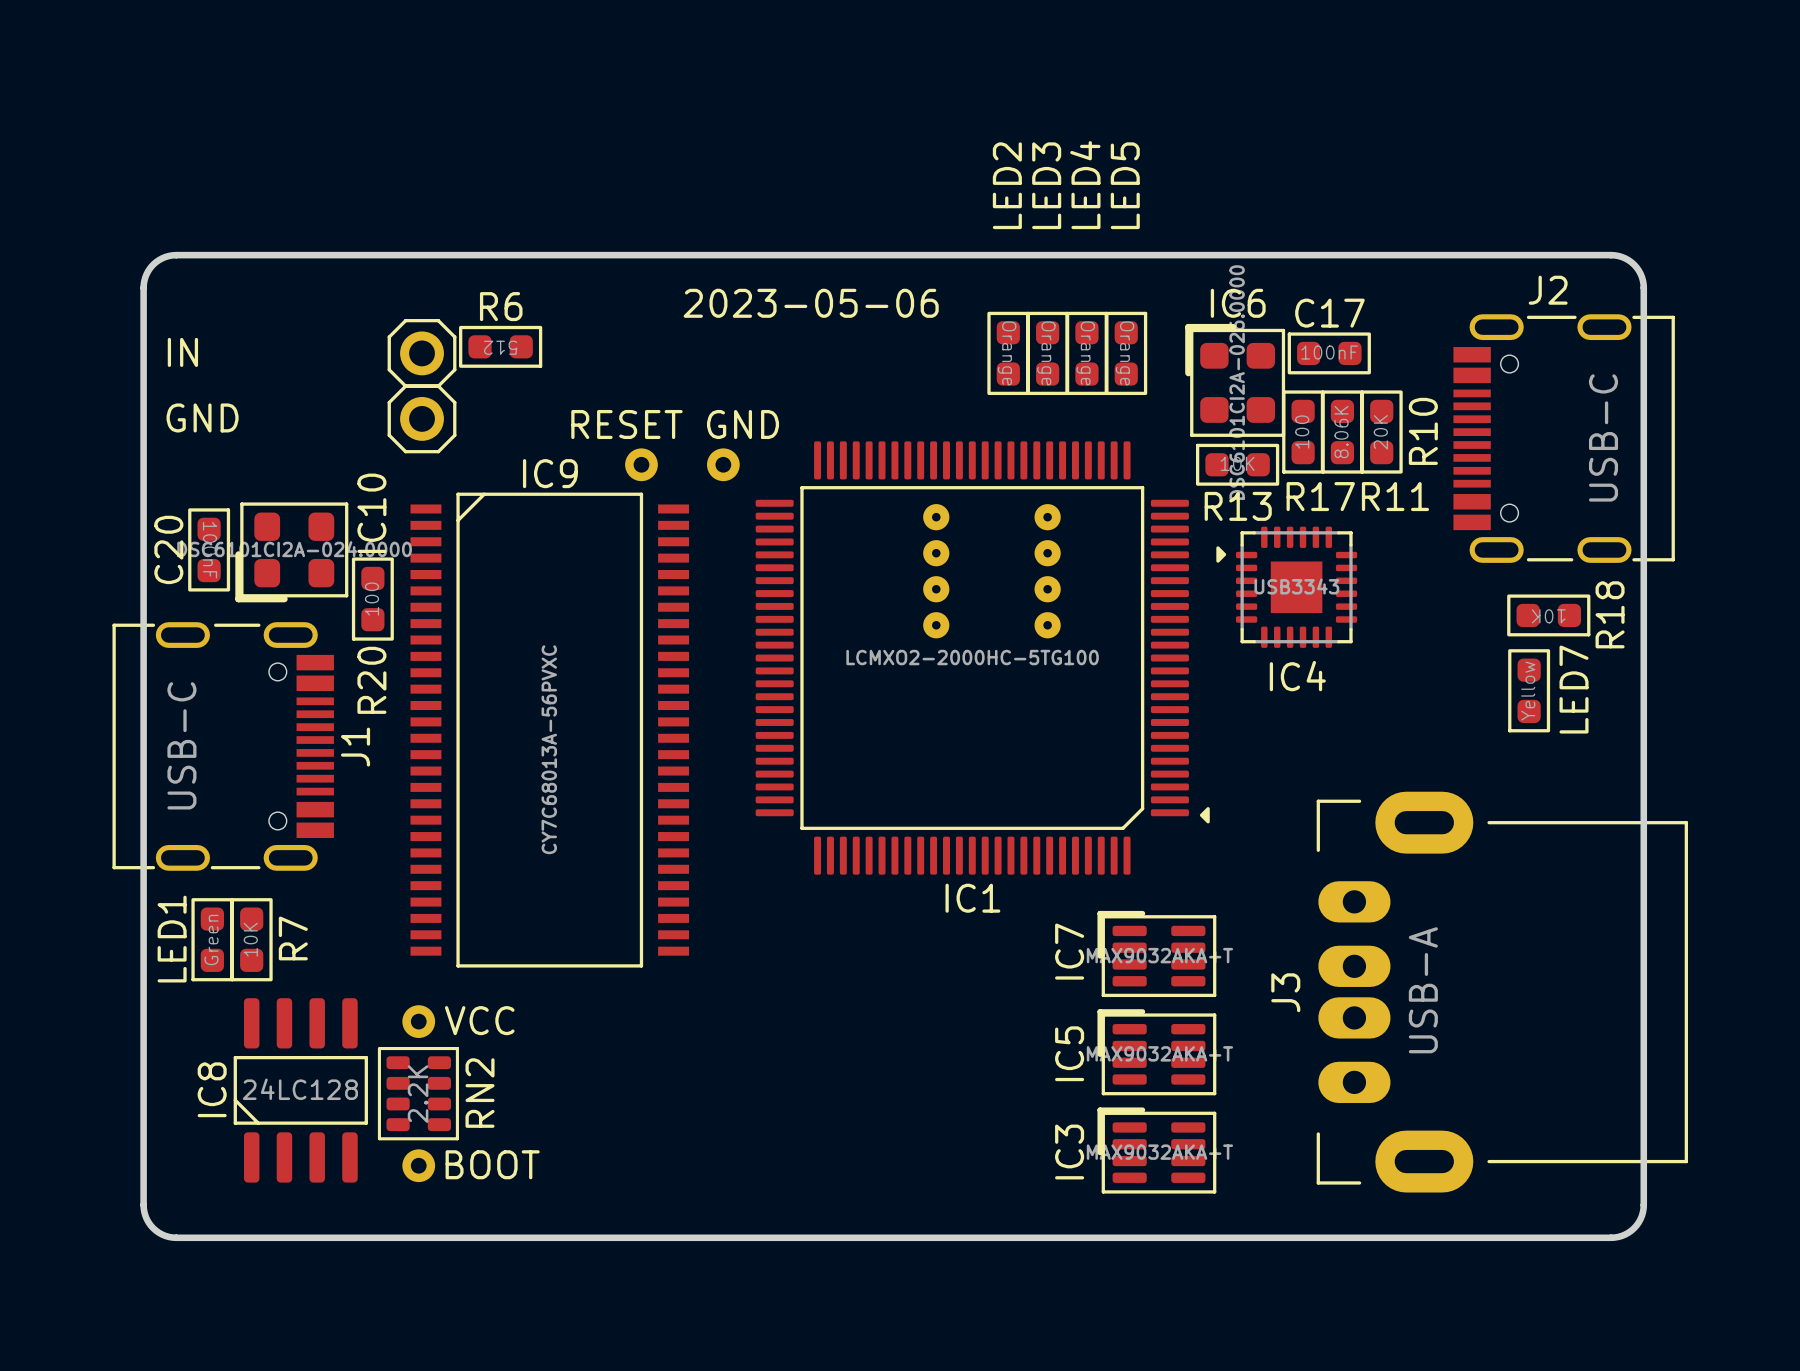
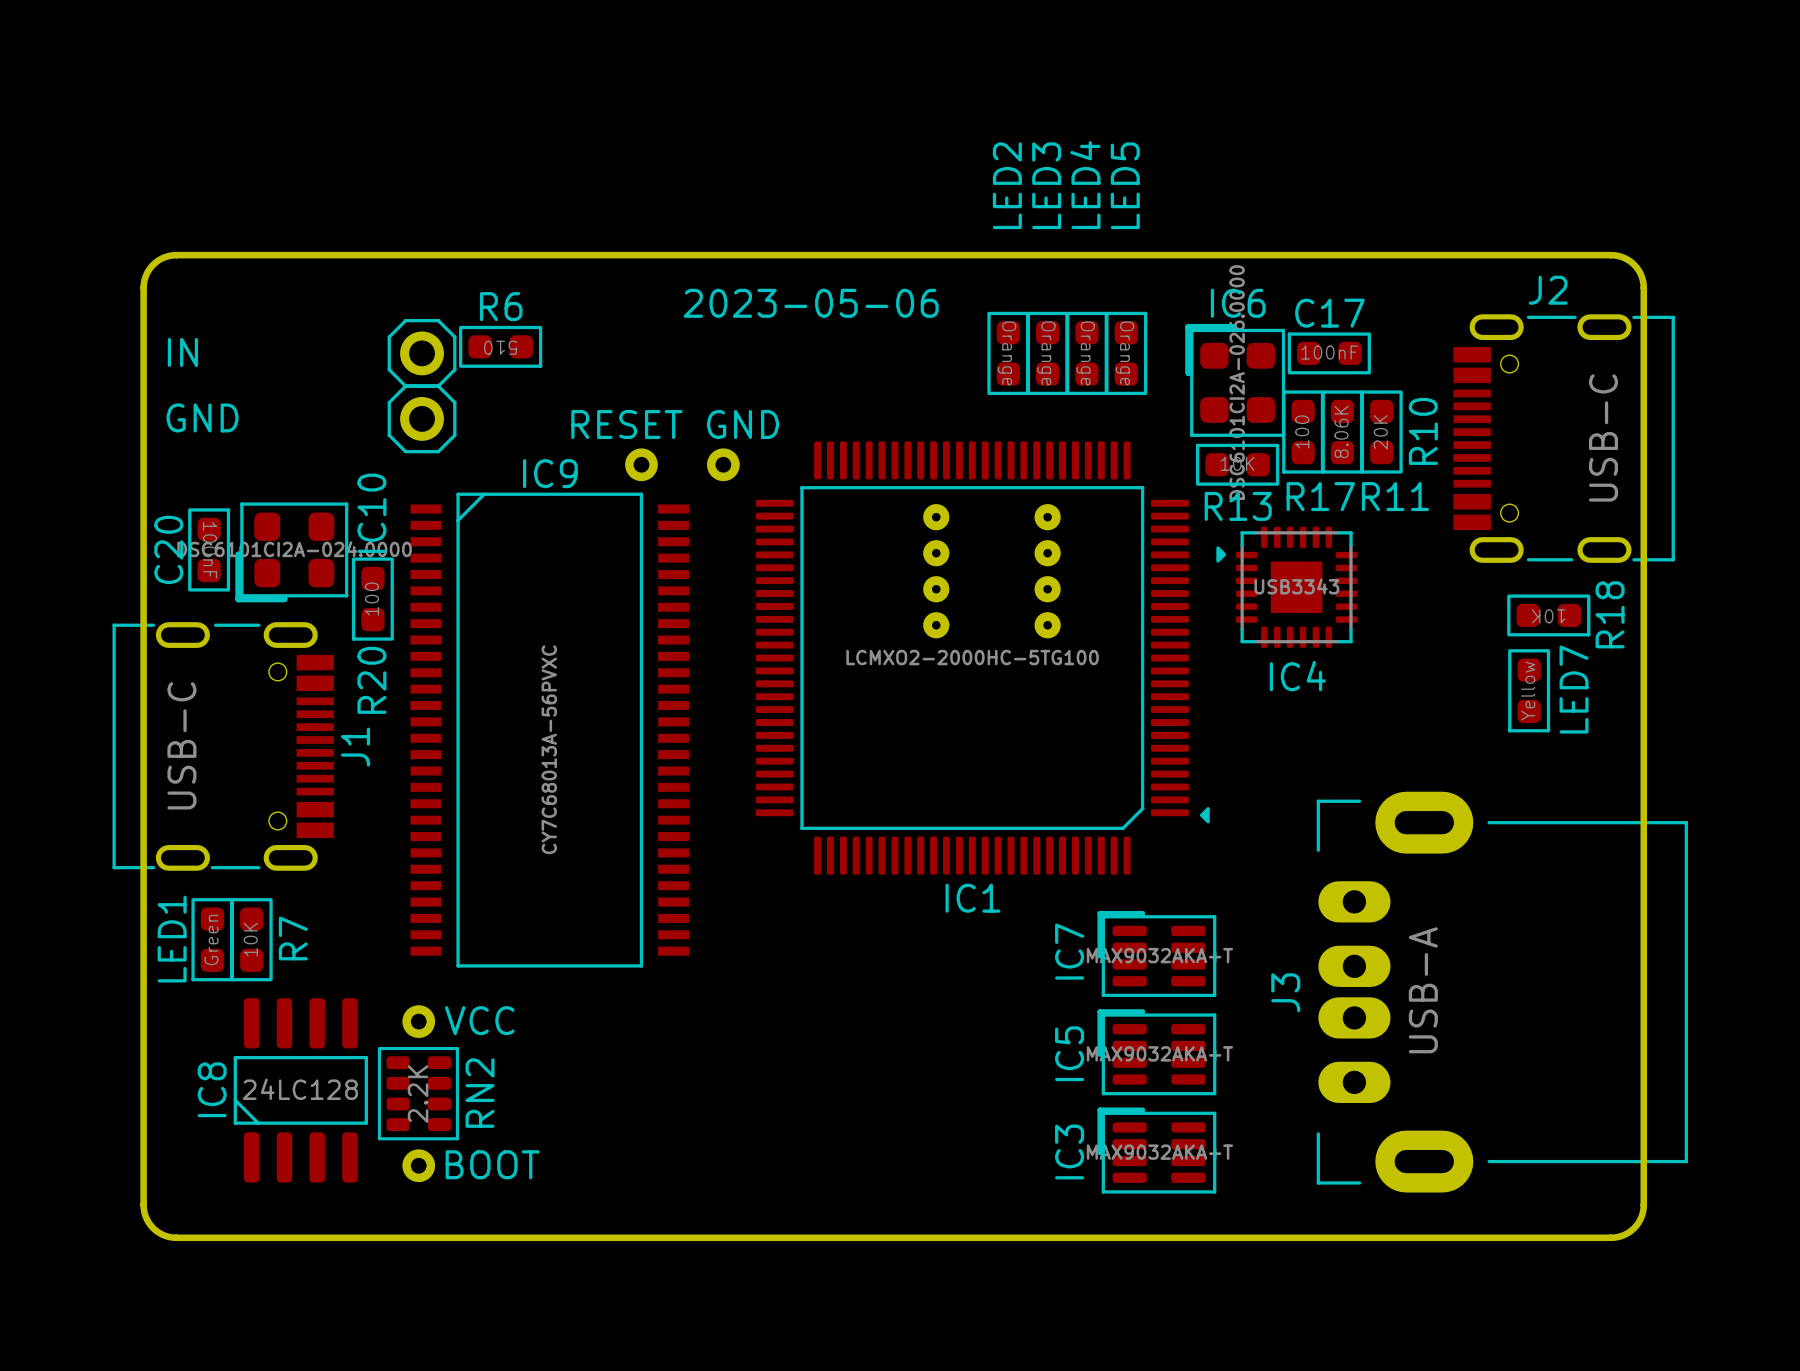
R6 value: 512 (500, 347) -> 510 (500, 347)

